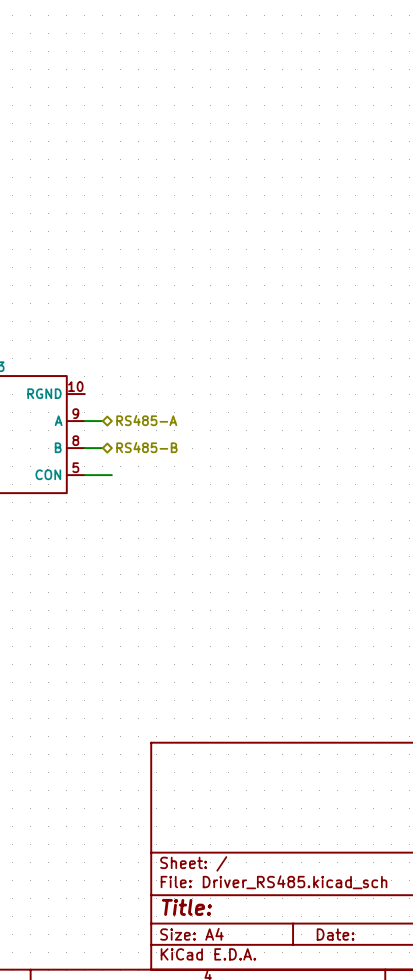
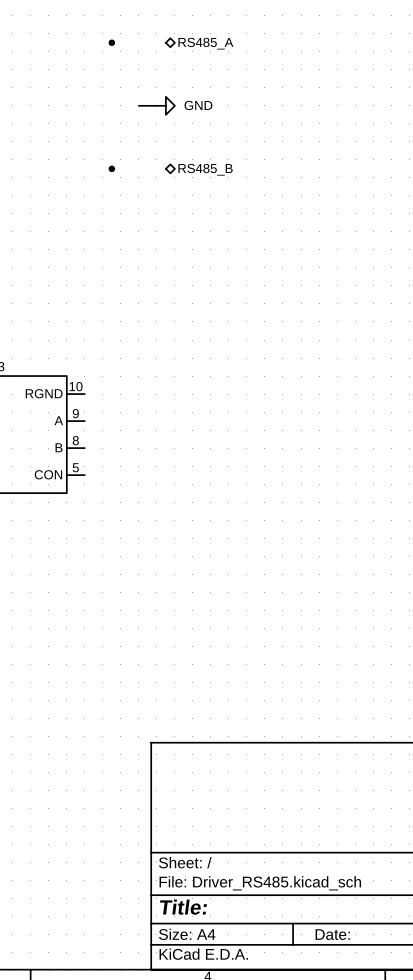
junction: none -> (111, 42)
hierarchical label: none -> RS485_A (205, 43)
wire: none -> (138, 105) (156, 105)
power symbol: none -> GND (165, 105)
junction: none -> (111, 168)
hierarchical label: none -> RS485_B (205, 169)
hierarchical label: RS485-A (146, 420) -> none
wire: (84, 421) (102, 421) -> none
hierarchical label: RS485-B (146, 447) -> none
wire: (84, 448) (102, 448) -> none
wire: (84, 475) (111, 475) -> none

